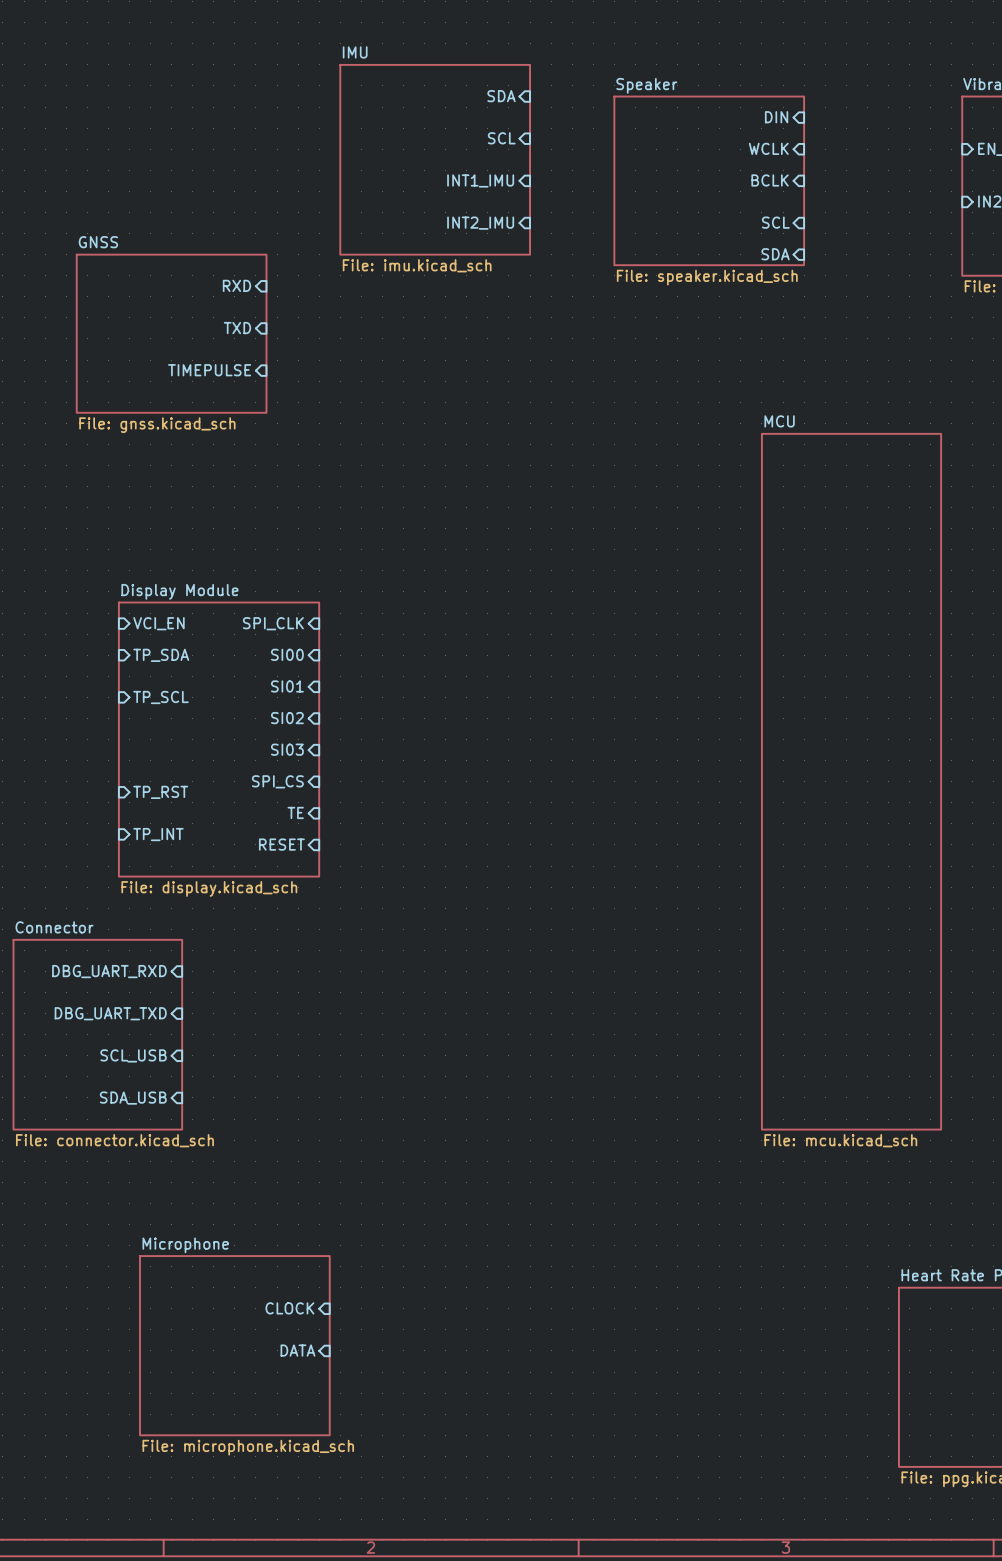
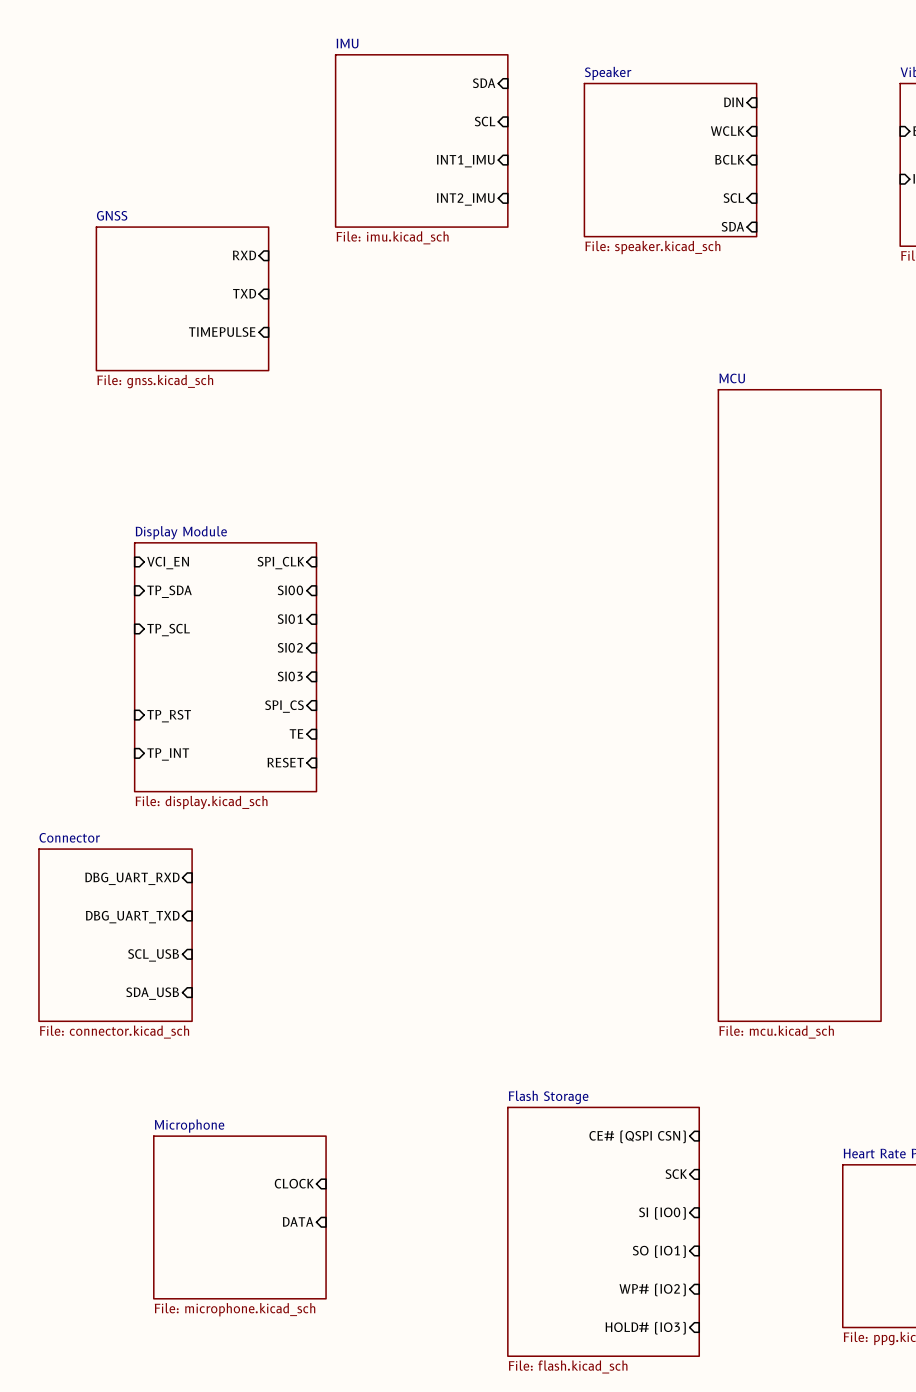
sheet pin: none -> CE# (QSPI CSN) (637, 1136)
sheet pin: none -> SCK (676, 1174)
sheet pin: none -> SI (IO0) (662, 1213)
sheet Flash Storage: none -> File: flash.kicad_sch (603, 1231)
sheet pin: none -> SO (IO1) (659, 1251)
sheet pin: none -> WP# (IO2) (652, 1289)
sheet pin: none -> HOLD# (IO3) (645, 1328)

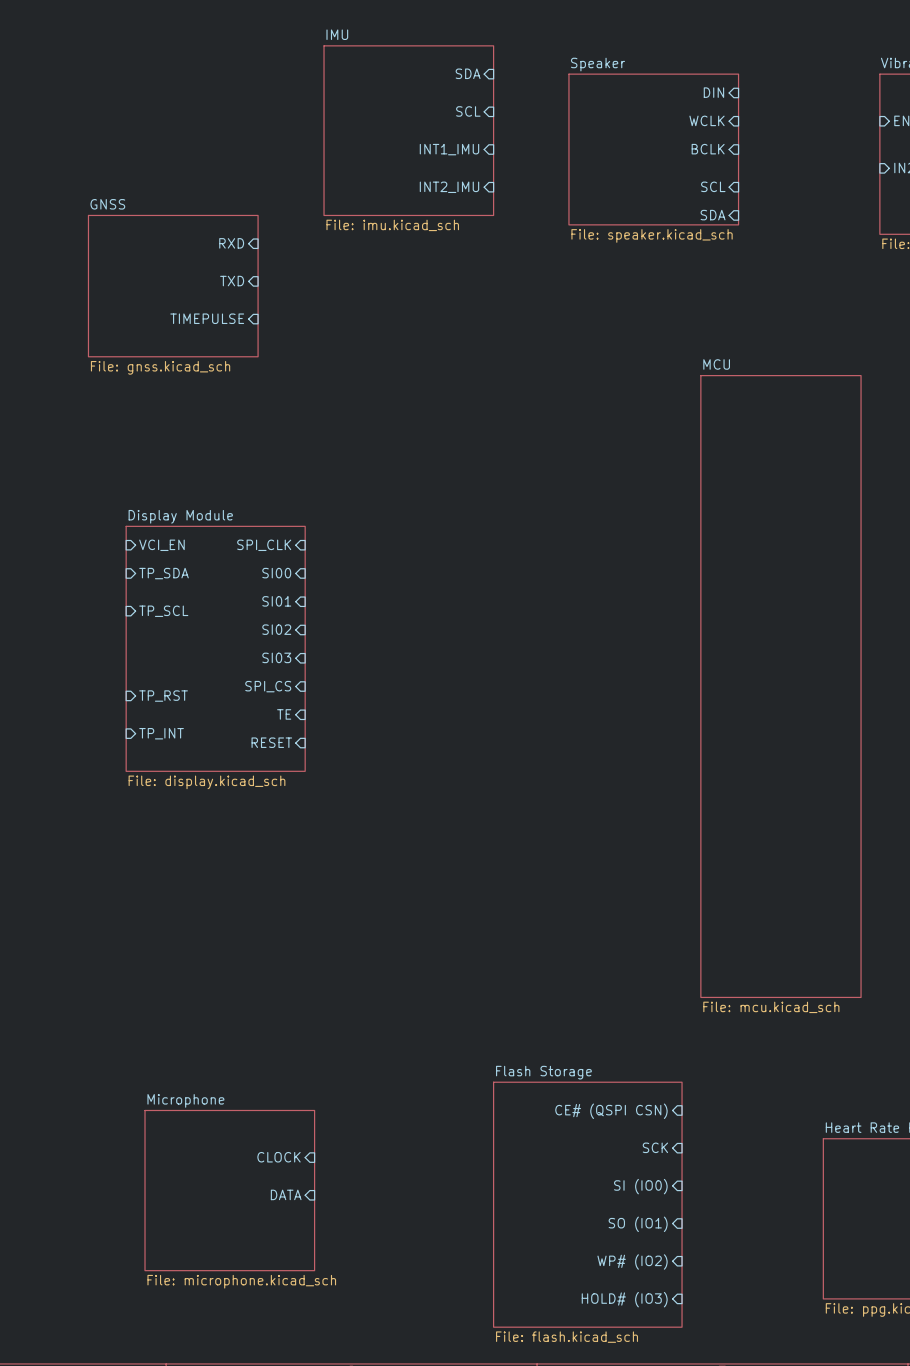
sheet pin: DBG_UART_RXD (132, 878) -> none
sheet pin: DBG_UART_TXD (132, 917) -> none
sheet Connector: File: connector.kicad_sch (115, 935) -> none
sheet pin: SCL_USB (153, 955) -> none
sheet pin: SDA_USB (152, 993) -> none

